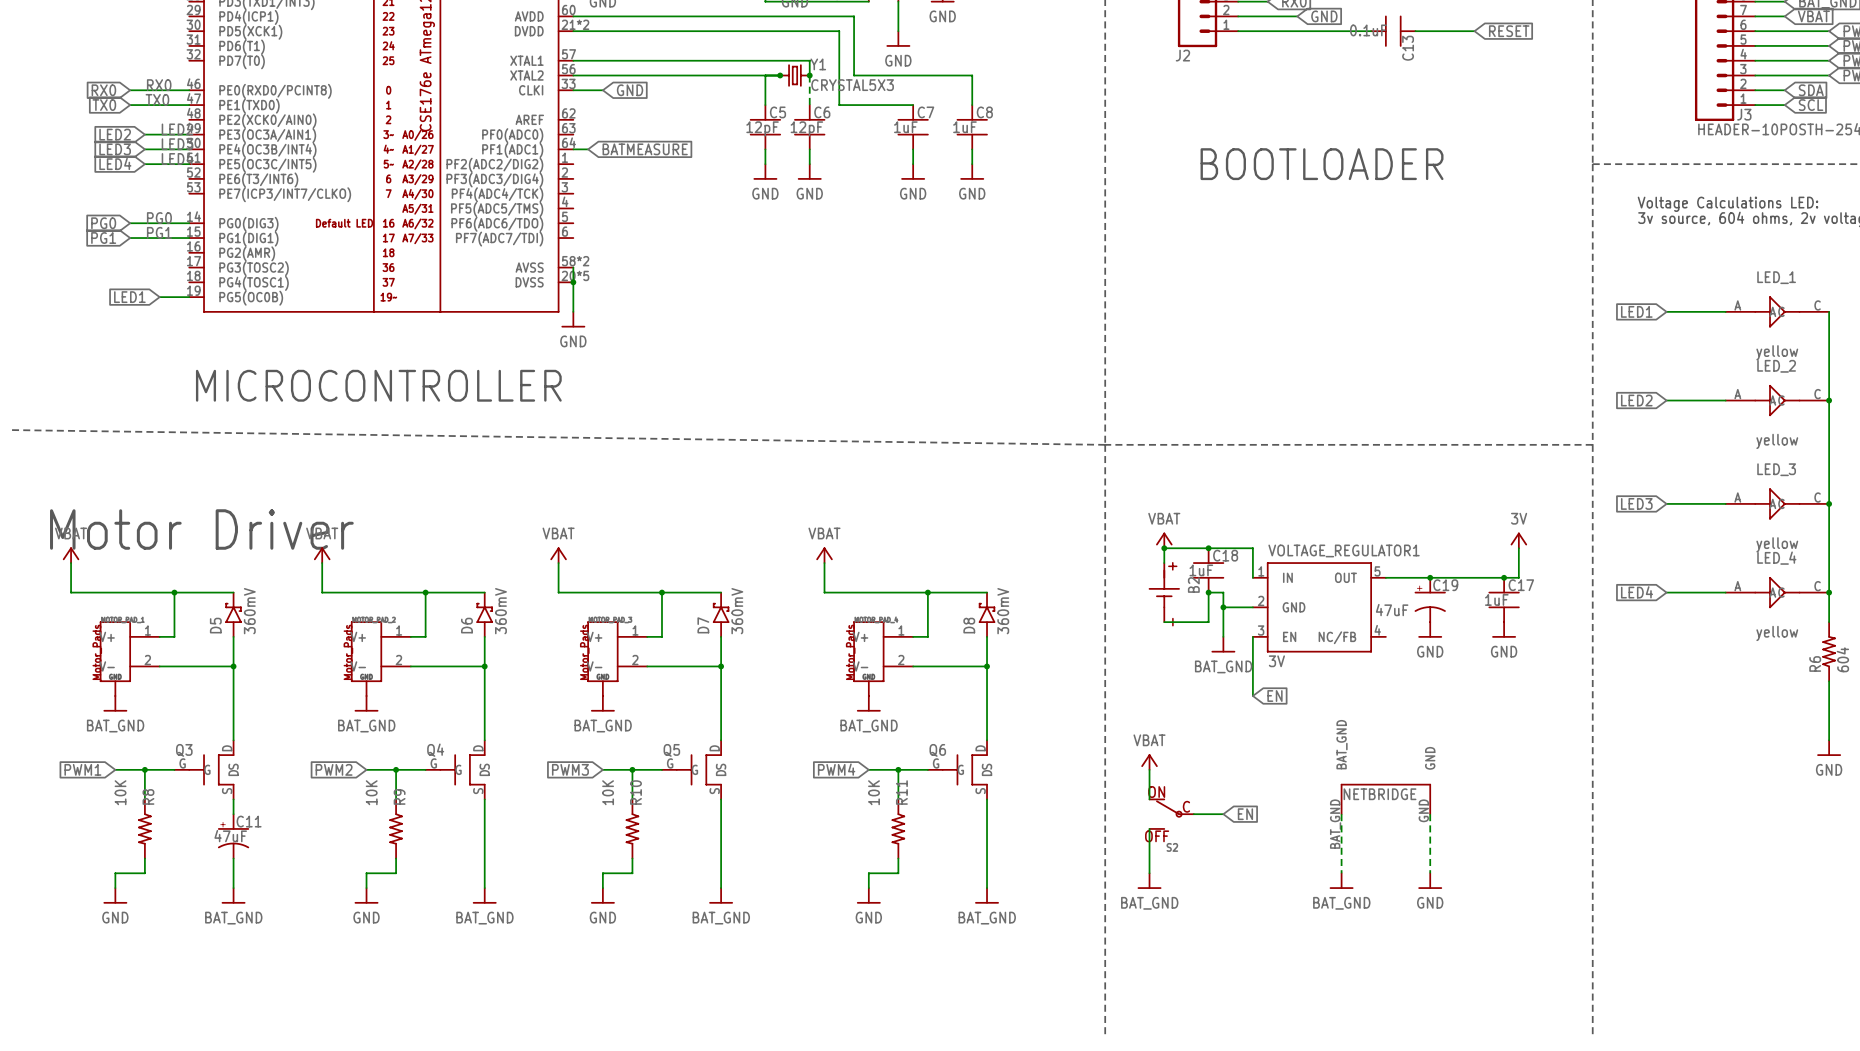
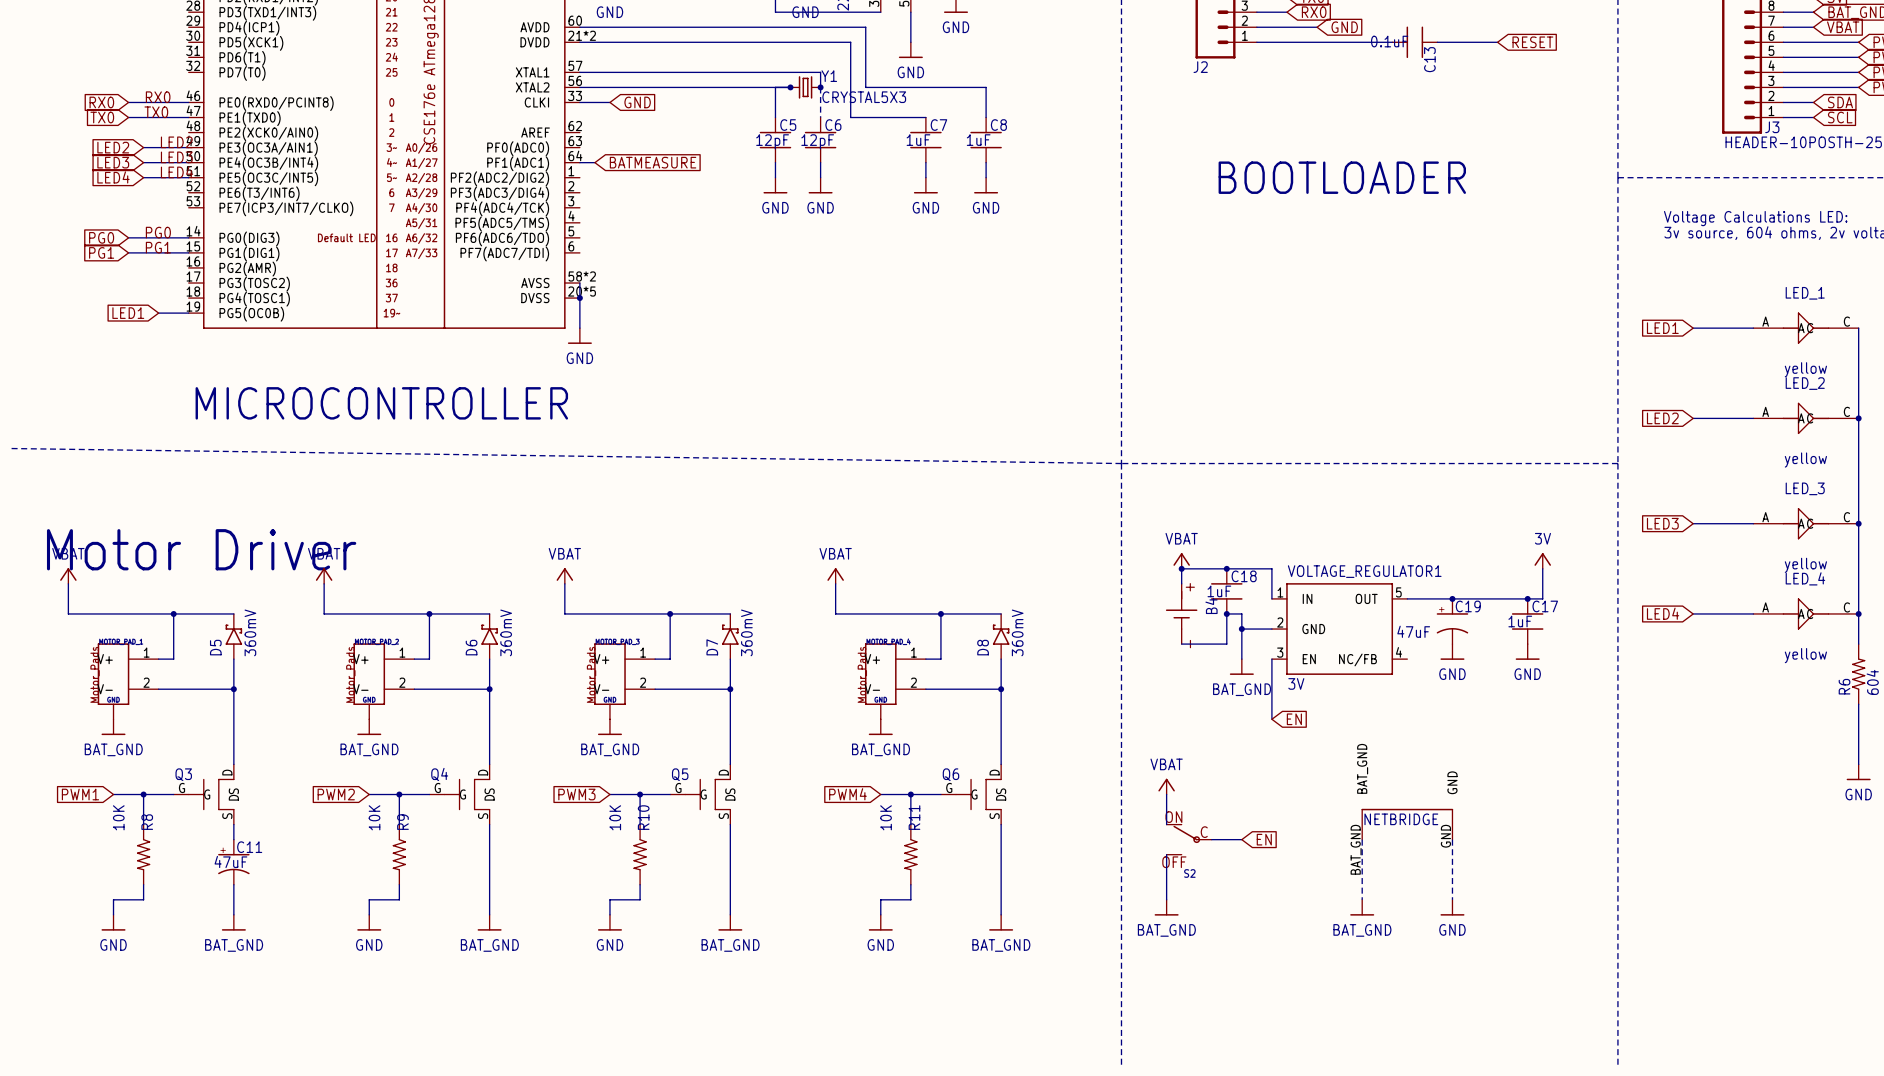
B2 name: B2 (1193, 584) -> B4 (1211, 606)

